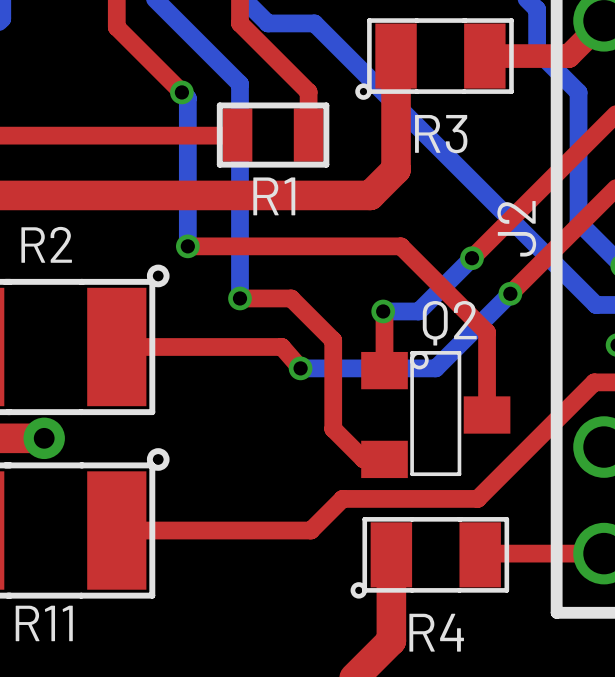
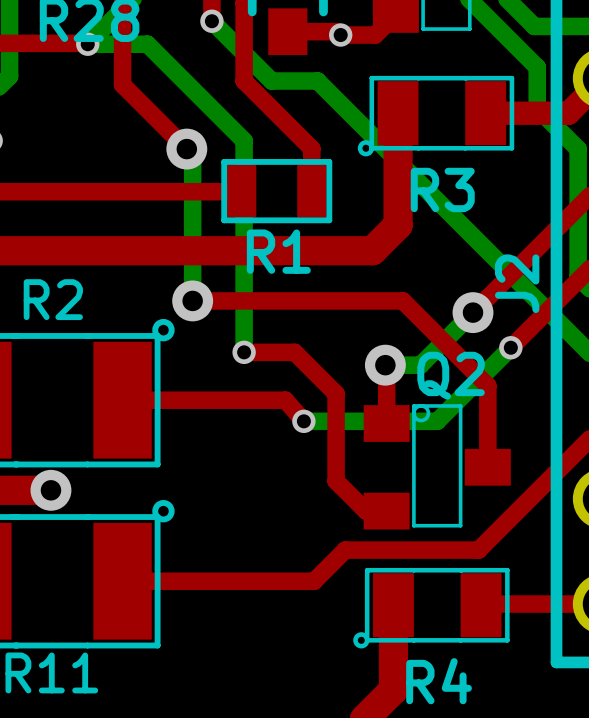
via size: [170, 80, 194, 105] -> [166, 128, 208, 170]
via size: [175, 234, 200, 259] -> [172, 280, 214, 322]
via size: [460, 246, 484, 271] -> [452, 292, 494, 334]
via size: [371, 299, 396, 324] -> [364, 344, 406, 386]

